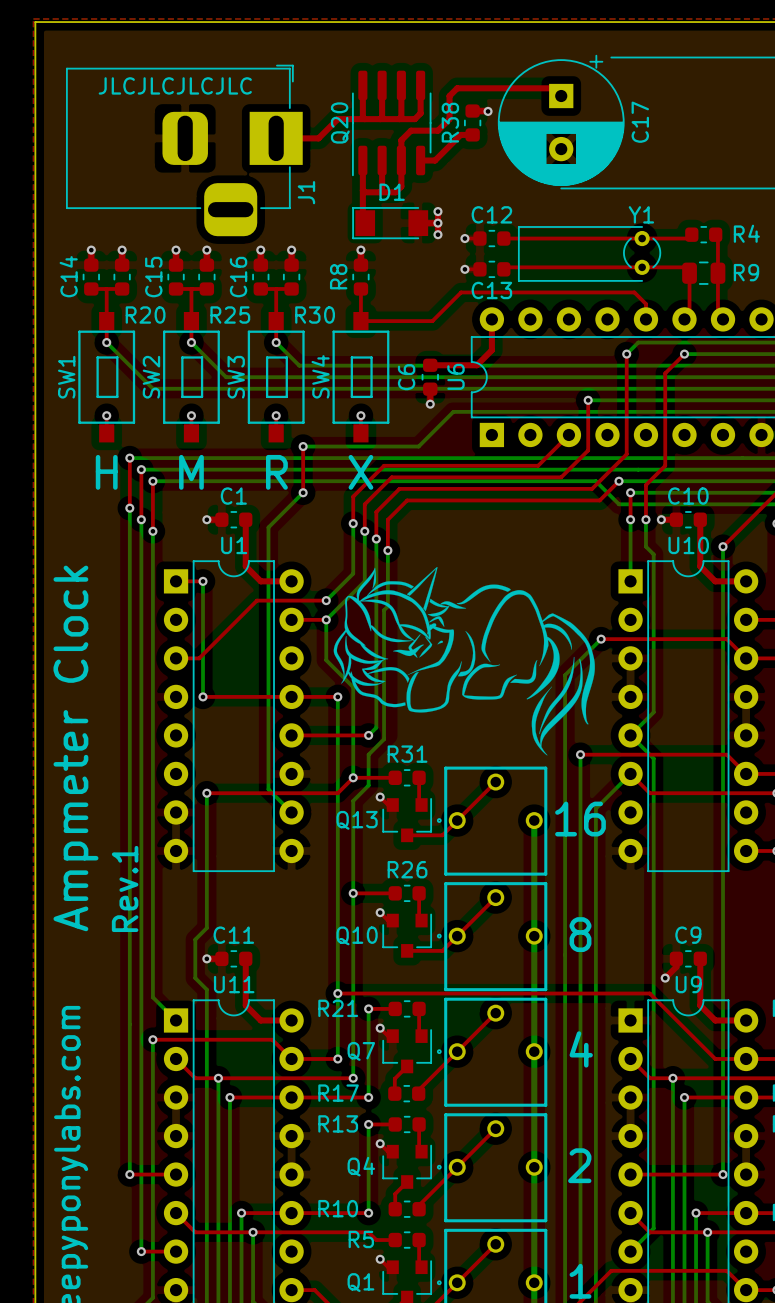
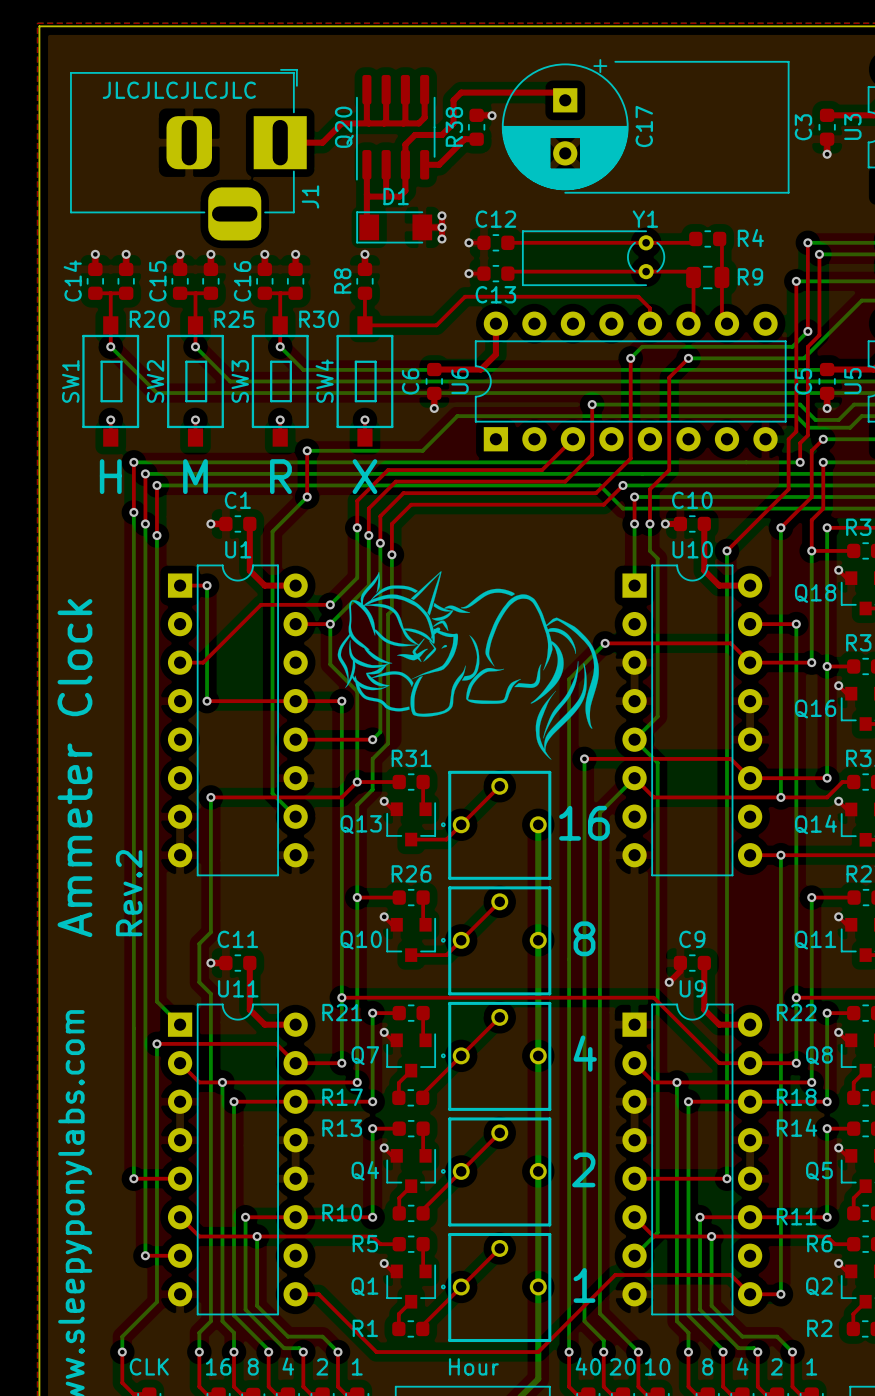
text: Ampmeter Clock (75, 748) -> Ammeter Clock (74, 768)
text: Rev.1 (125, 888) -> Rev.2 (129, 893)

